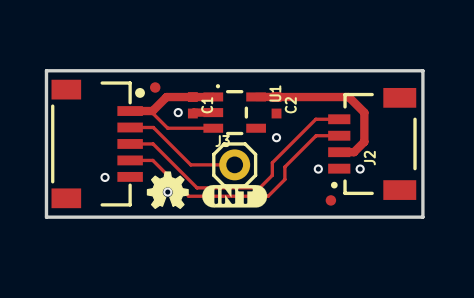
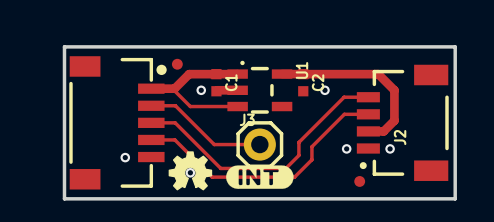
via position: (276, 137) -> (324, 90)

